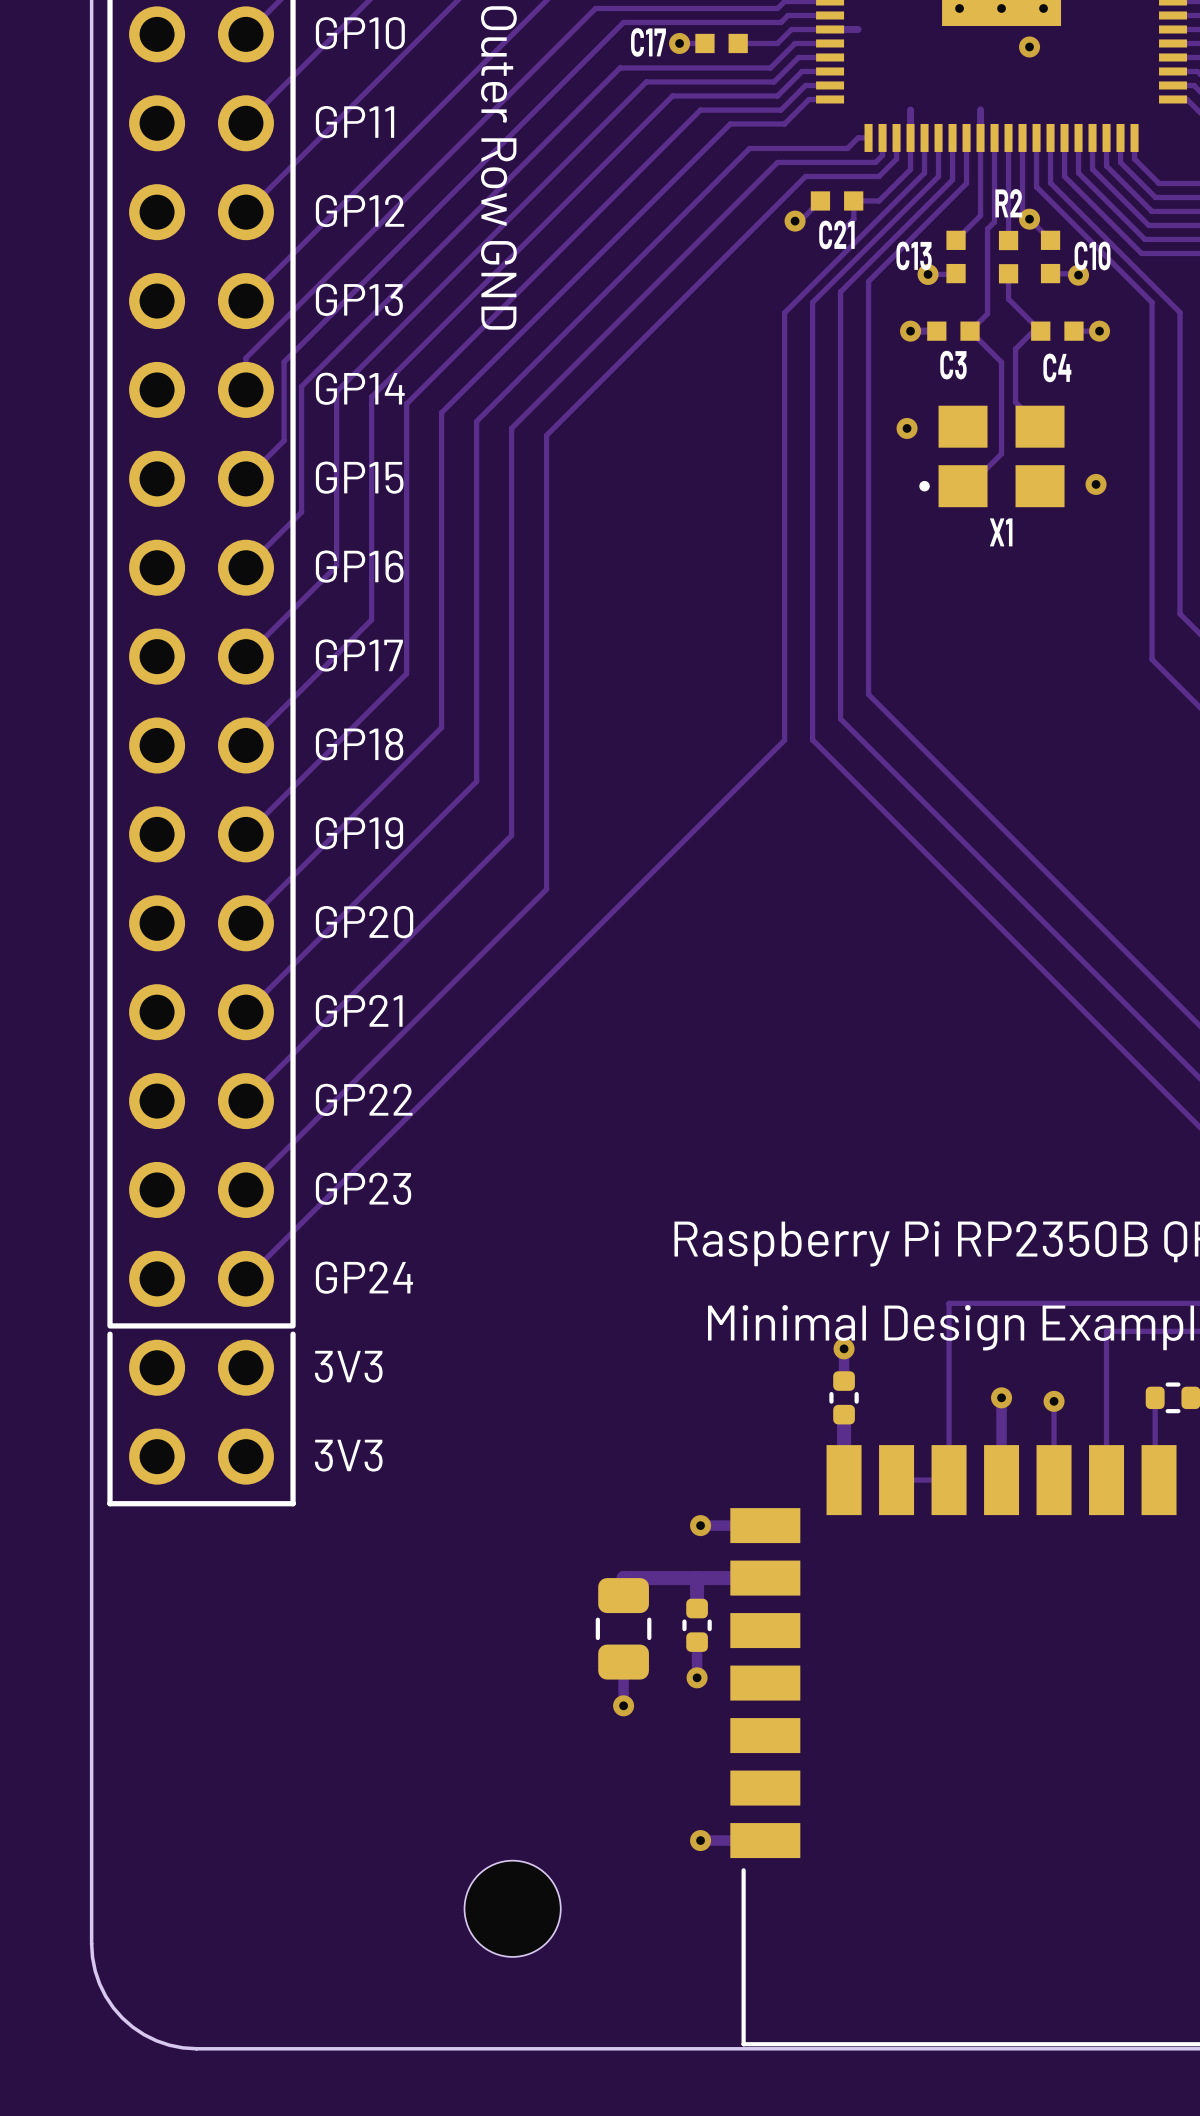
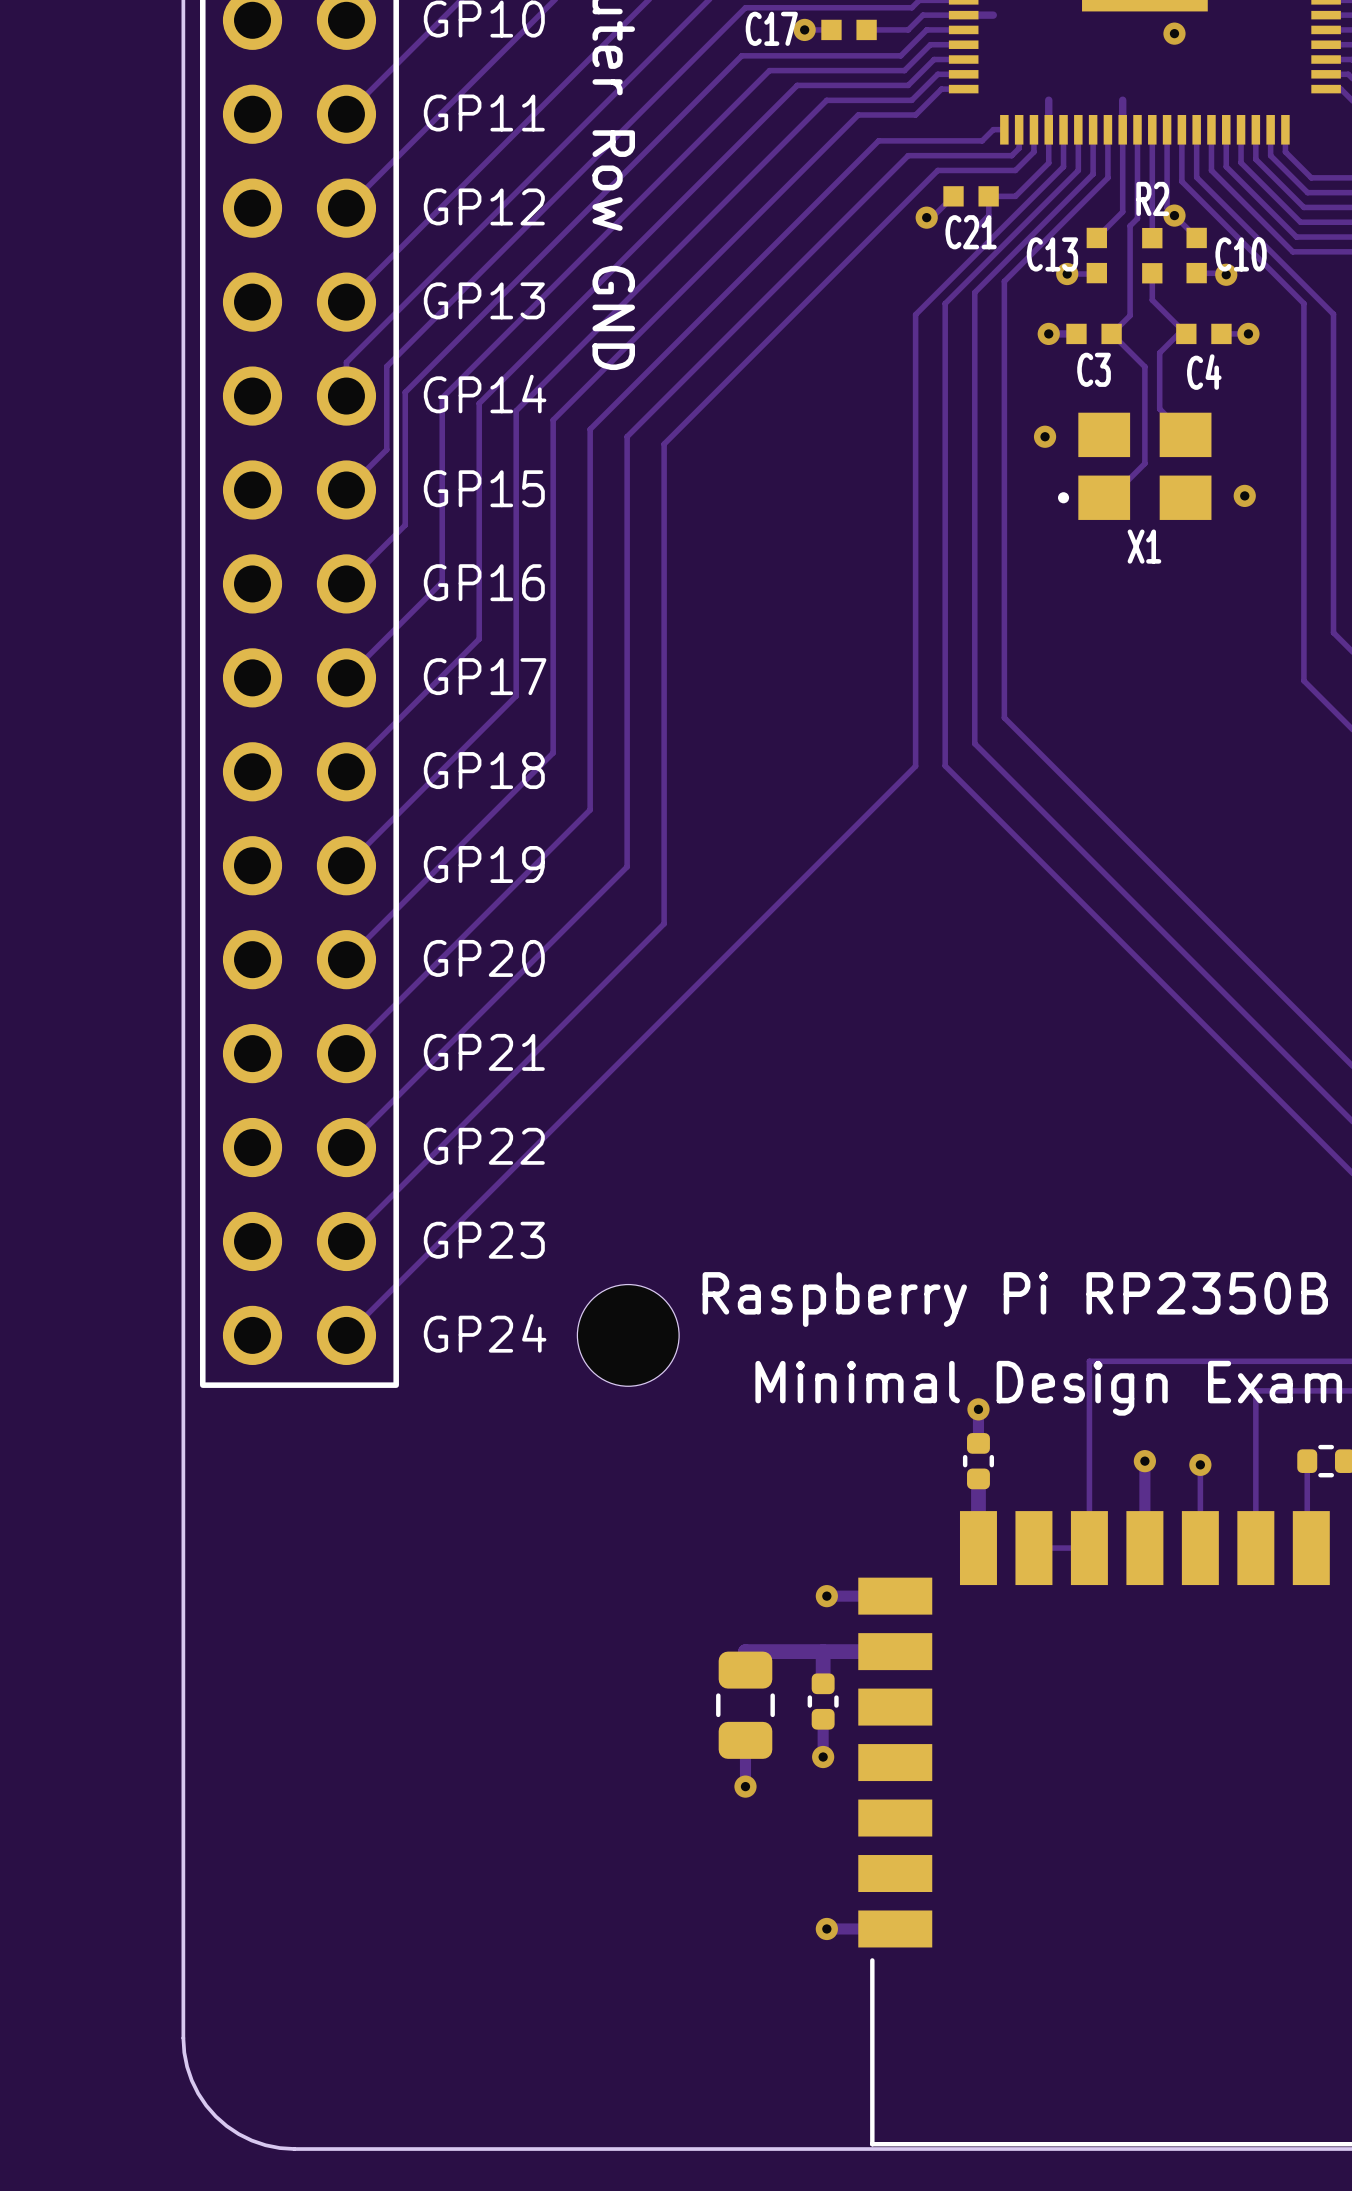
text: 3V3 (348, 1366) -> none
part: (201, 1418) -> none
text: 3V3 (348, 1455) -> none
part position: (512, 1908) -> (628, 1335)

